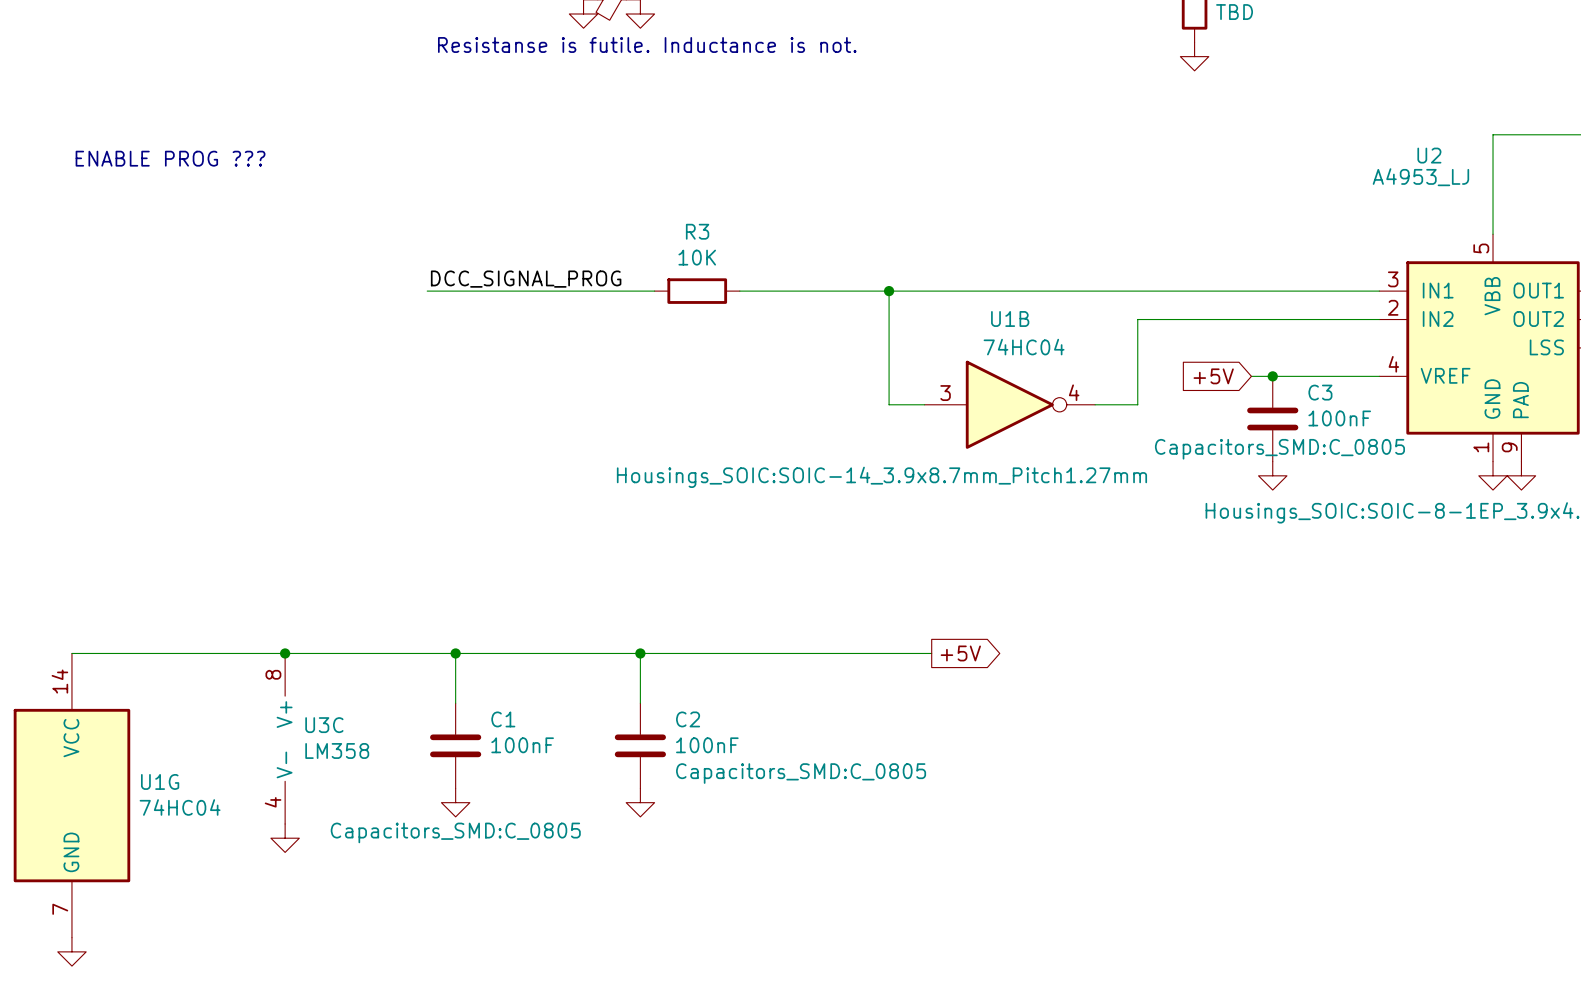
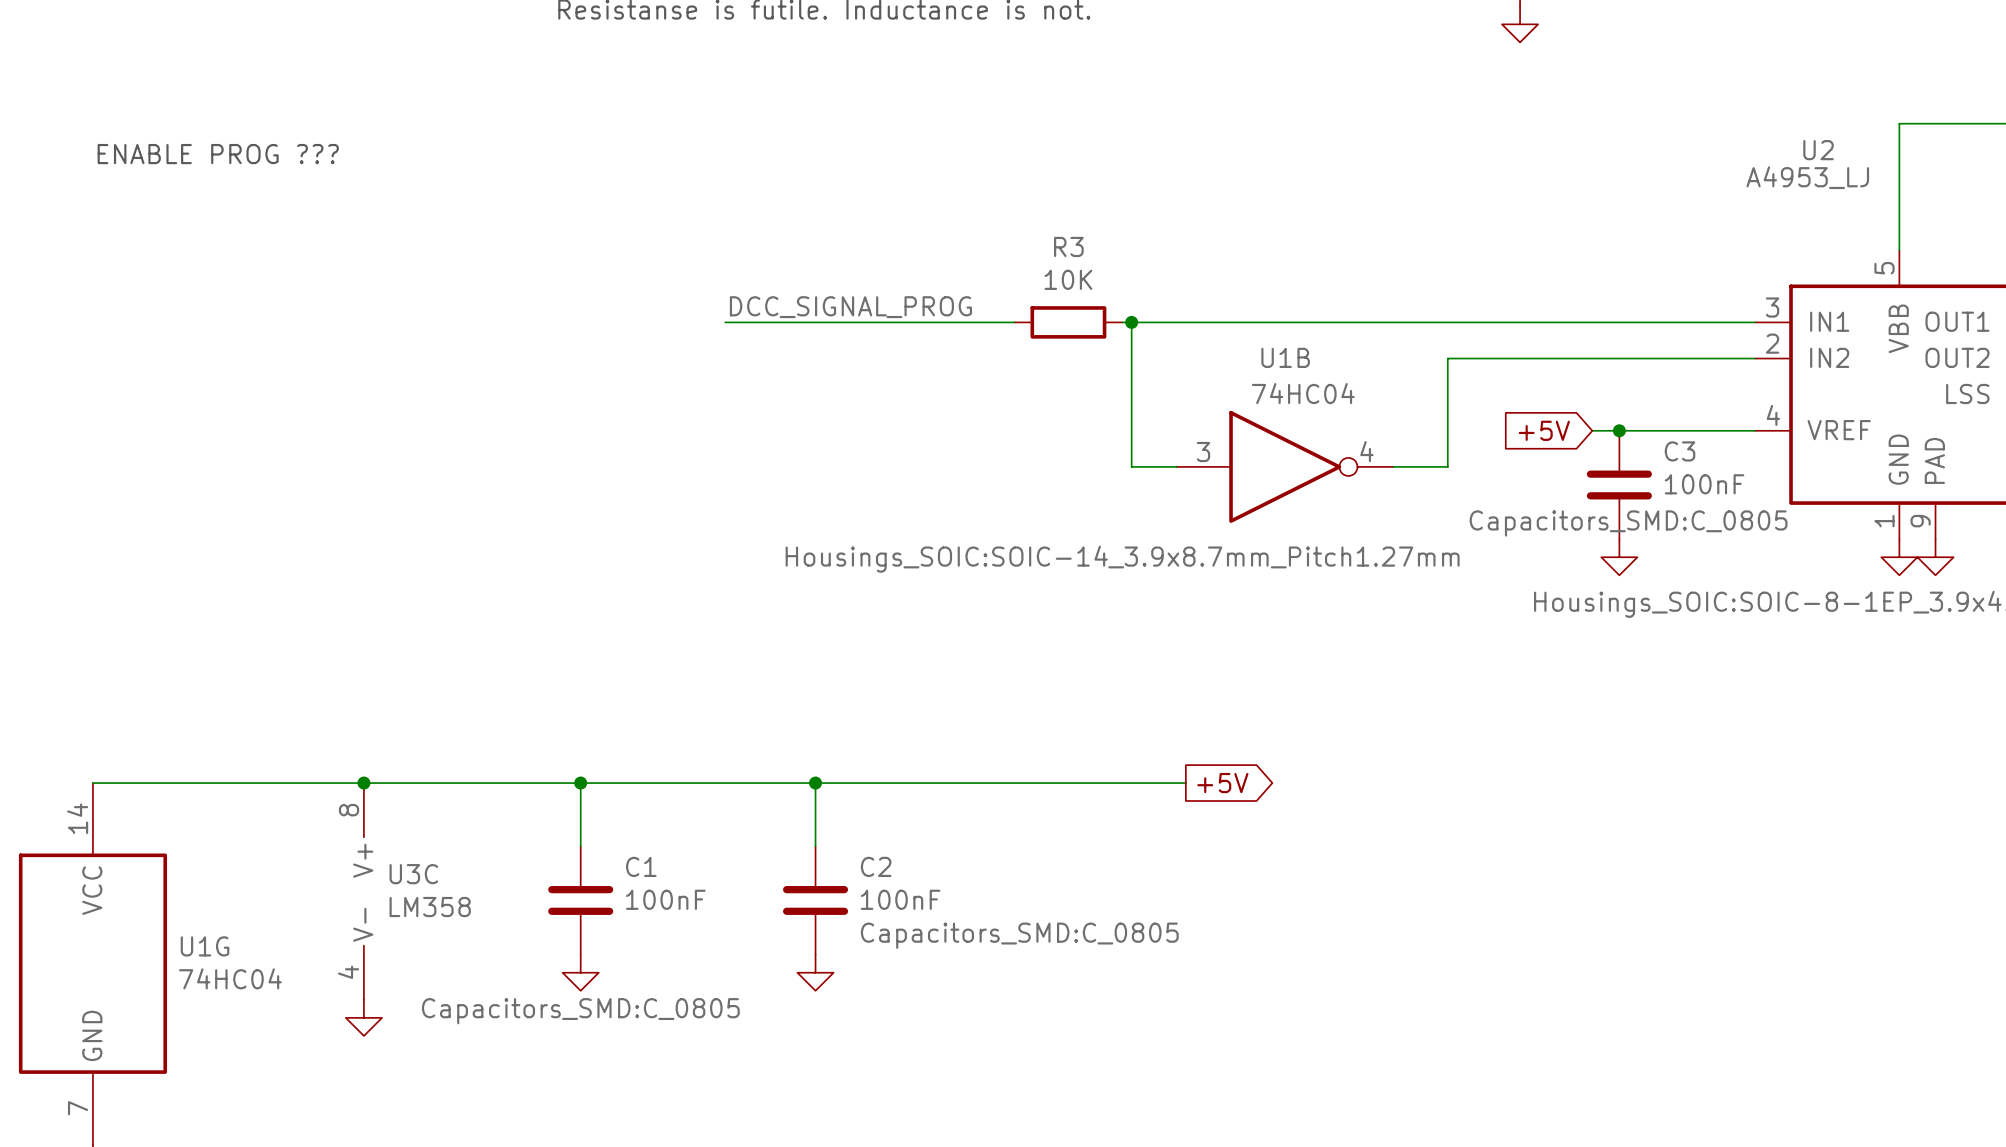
label position: DCC_SIGNAL_PROG (526, 279) -> DCC_SIGNAL_PROG (850, 307)
wire: (427, 291) (569, 291) -> none
R3 position: (697, 291) -> (1068, 322)
wire: (796, 291) (881, 291) -> (833, 322) (941, 322)

